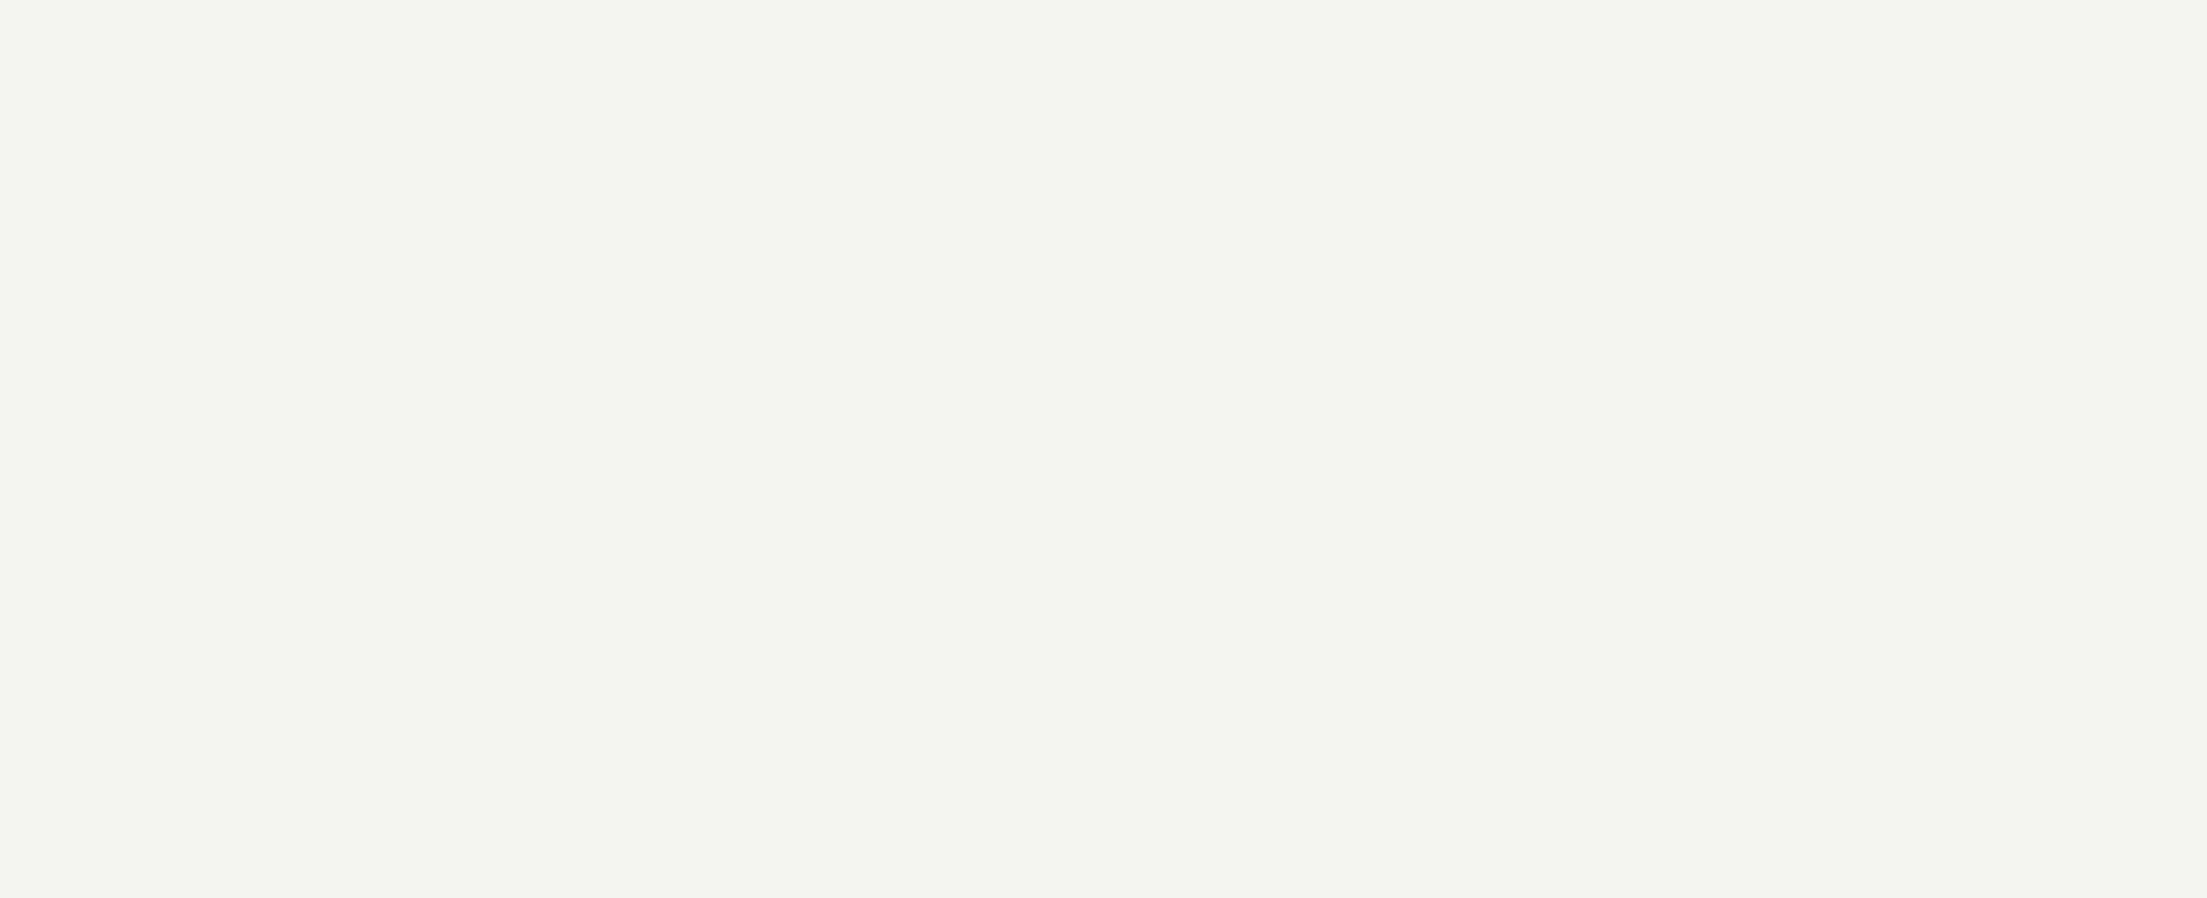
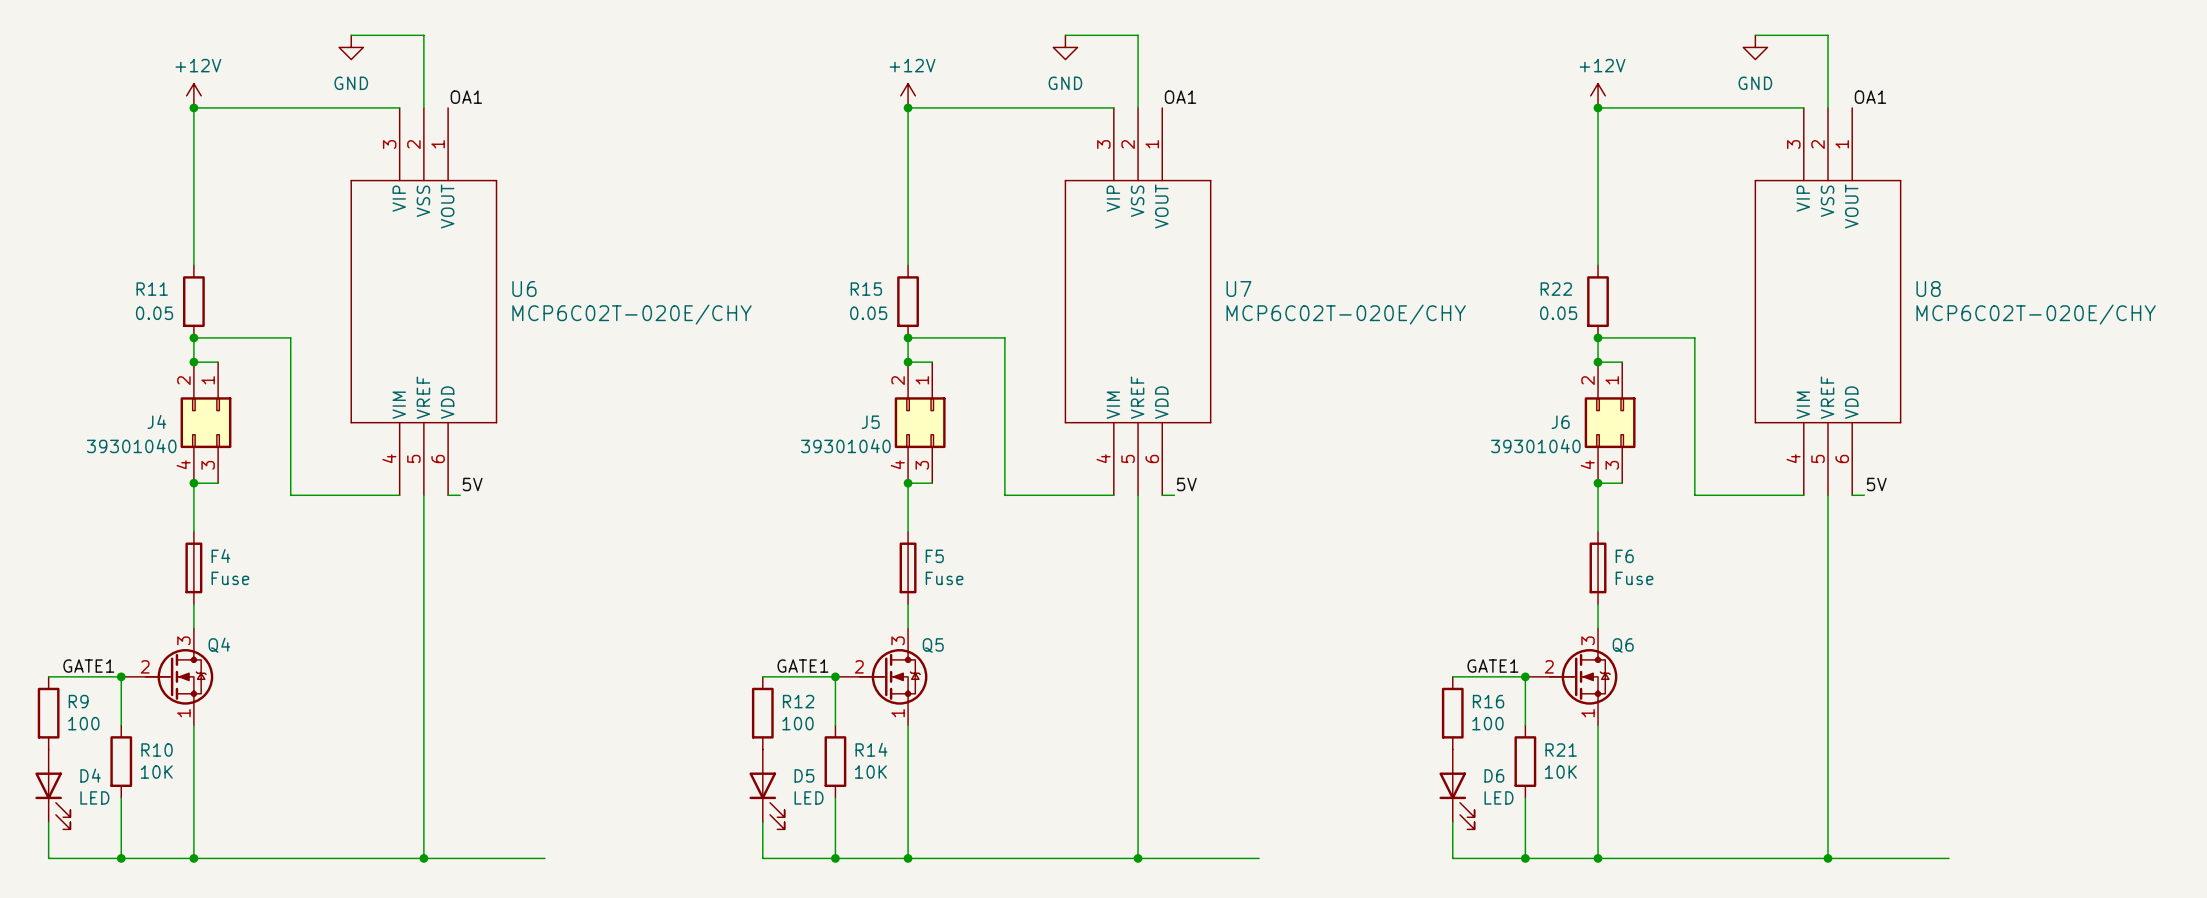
wire: none -> (351, 35) (423, 35) (423, 107)
wire: none -> (1065, 35) (1138, 35) (1138, 107)
wire: none -> (1755, 35) (1828, 35) (1828, 107)
power symbol: none -> GND (351, 47)
power symbol: none -> GND (1065, 47)
power symbol: none -> GND (1755, 47)
power symbol: none -> +12V (193, 95)
power symbol: none -> +12V (908, 95)
power symbol: none -> +12V (1598, 95)
label: none -> OA1 (466, 97)
label: none -> OA1 (1180, 97)
label: none -> OA1 (1870, 97)
junction: none -> (193, 107)
wire: none -> (399, 107) (193, 107) (193, 265)
junction: none -> (908, 107)
wire: none -> (1113, 107) (908, 107) (908, 265)
junction: none -> (1598, 107)
wire: none -> (1803, 107) (1598, 107) (1598, 265)
R11: none -> 0.05 (193, 301)
U6: none -> MCP6C02T-020E/CHY (423, 301)
R15: none -> 0.05 (908, 301)
U7: none -> MCP6C02T-020E/CHY (1138, 301)
R22: none -> 0.05 (1598, 301)
U8: none -> MCP6C02T-020E/CHY (1828, 301)
junction: none -> (193, 337)
junction: none -> (908, 337)
junction: none -> (1598, 337)
junction: none -> (193, 362)
wire: none -> (218, 362) (193, 362) (193, 337) (290, 337) (290, 495) (399, 495)
junction: none -> (908, 362)
wire: none -> (932, 362) (908, 362) (908, 337) (1004, 337) (1004, 495) (1113, 495)
junction: none -> (1598, 362)
wire: none -> (1622, 362) (1598, 362) (1598, 337) (1694, 337) (1694, 495) (1803, 495)
J4: none -> 39301040 (206, 422)
J5: none -> 39301040 (920, 422)
J6: none -> 39301040 (1610, 422)
junction: none -> (193, 483)
wire: none -> (218, 483) (193, 483) (193, 531)
junction: none -> (908, 483)
wire: none -> (932, 483) (908, 483) (908, 531)
junction: none -> (1598, 483)
wire: none -> (1622, 483) (1598, 483) (1598, 531)
label: none -> 5V (472, 484)
label: none -> 5V (1186, 484)
label: none -> 5V (1876, 484)
wire: none -> (423, 495) (423, 858)
wire: none -> (448, 495) (460, 495)
wire: none -> (1138, 495) (1138, 858)
wire: none -> (1162, 495) (1174, 495)
wire: none -> (1828, 495) (1828, 858)
wire: none -> (1852, 495) (1864, 495)
F4: none -> Fuse (193, 567)
F5: none -> Fuse (908, 567)
F6: none -> Fuse (1598, 567)
wire: none -> (193, 604) (193, 628)
wire: none -> (908, 604) (908, 628)
wire: none -> (1598, 604) (1598, 628)
label: none -> GATE1 (88, 666)
label: none -> GATE1 (802, 666)
label: none -> GATE1 (1492, 666)
wire: none -> (48, 676) (121, 676) (121, 725)
junction: none -> (121, 676)
Q4: none -> (167, 676)
wire: none -> (762, 676) (835, 676) (835, 725)
junction: none -> (835, 676)
Q5: none -> (881, 676)
wire: none -> (1452, 676) (1525, 676) (1525, 725)
junction: none -> (1525, 676)
Q6: none -> (1571, 676)
R9: none -> 100 (48, 713)
R12: none -> 100 (762, 713)
R16: none -> 100 (1452, 713)
wire: none -> (193, 725) (193, 858)
wire: none -> (908, 725) (908, 858)
wire: none -> (1598, 725) (1598, 858)
R10: none -> 10K (121, 761)
R14: none -> 10K (835, 761)
R21: none -> 10K (1525, 761)
D4: none -> LED (52, 789)
D5: none -> LED (767, 789)
D6: none -> LED (1456, 789)
wire: none -> (121, 797) (121, 858)
wire: none -> (835, 797) (835, 858)
wire: none -> (1525, 797) (1525, 858)
wire: none -> (48, 822) (48, 858) (544, 858)
wire: none -> (762, 822) (762, 858) (1259, 858)
wire: none -> (1452, 822) (1452, 858) (1949, 858)
junction: none -> (121, 858)
junction: none -> (193, 858)
junction: none -> (423, 858)
junction: none -> (835, 858)
junction: none -> (908, 858)
junction: none -> (1138, 858)
junction: none -> (1525, 858)
junction: none -> (1598, 858)
junction: none -> (1828, 858)

